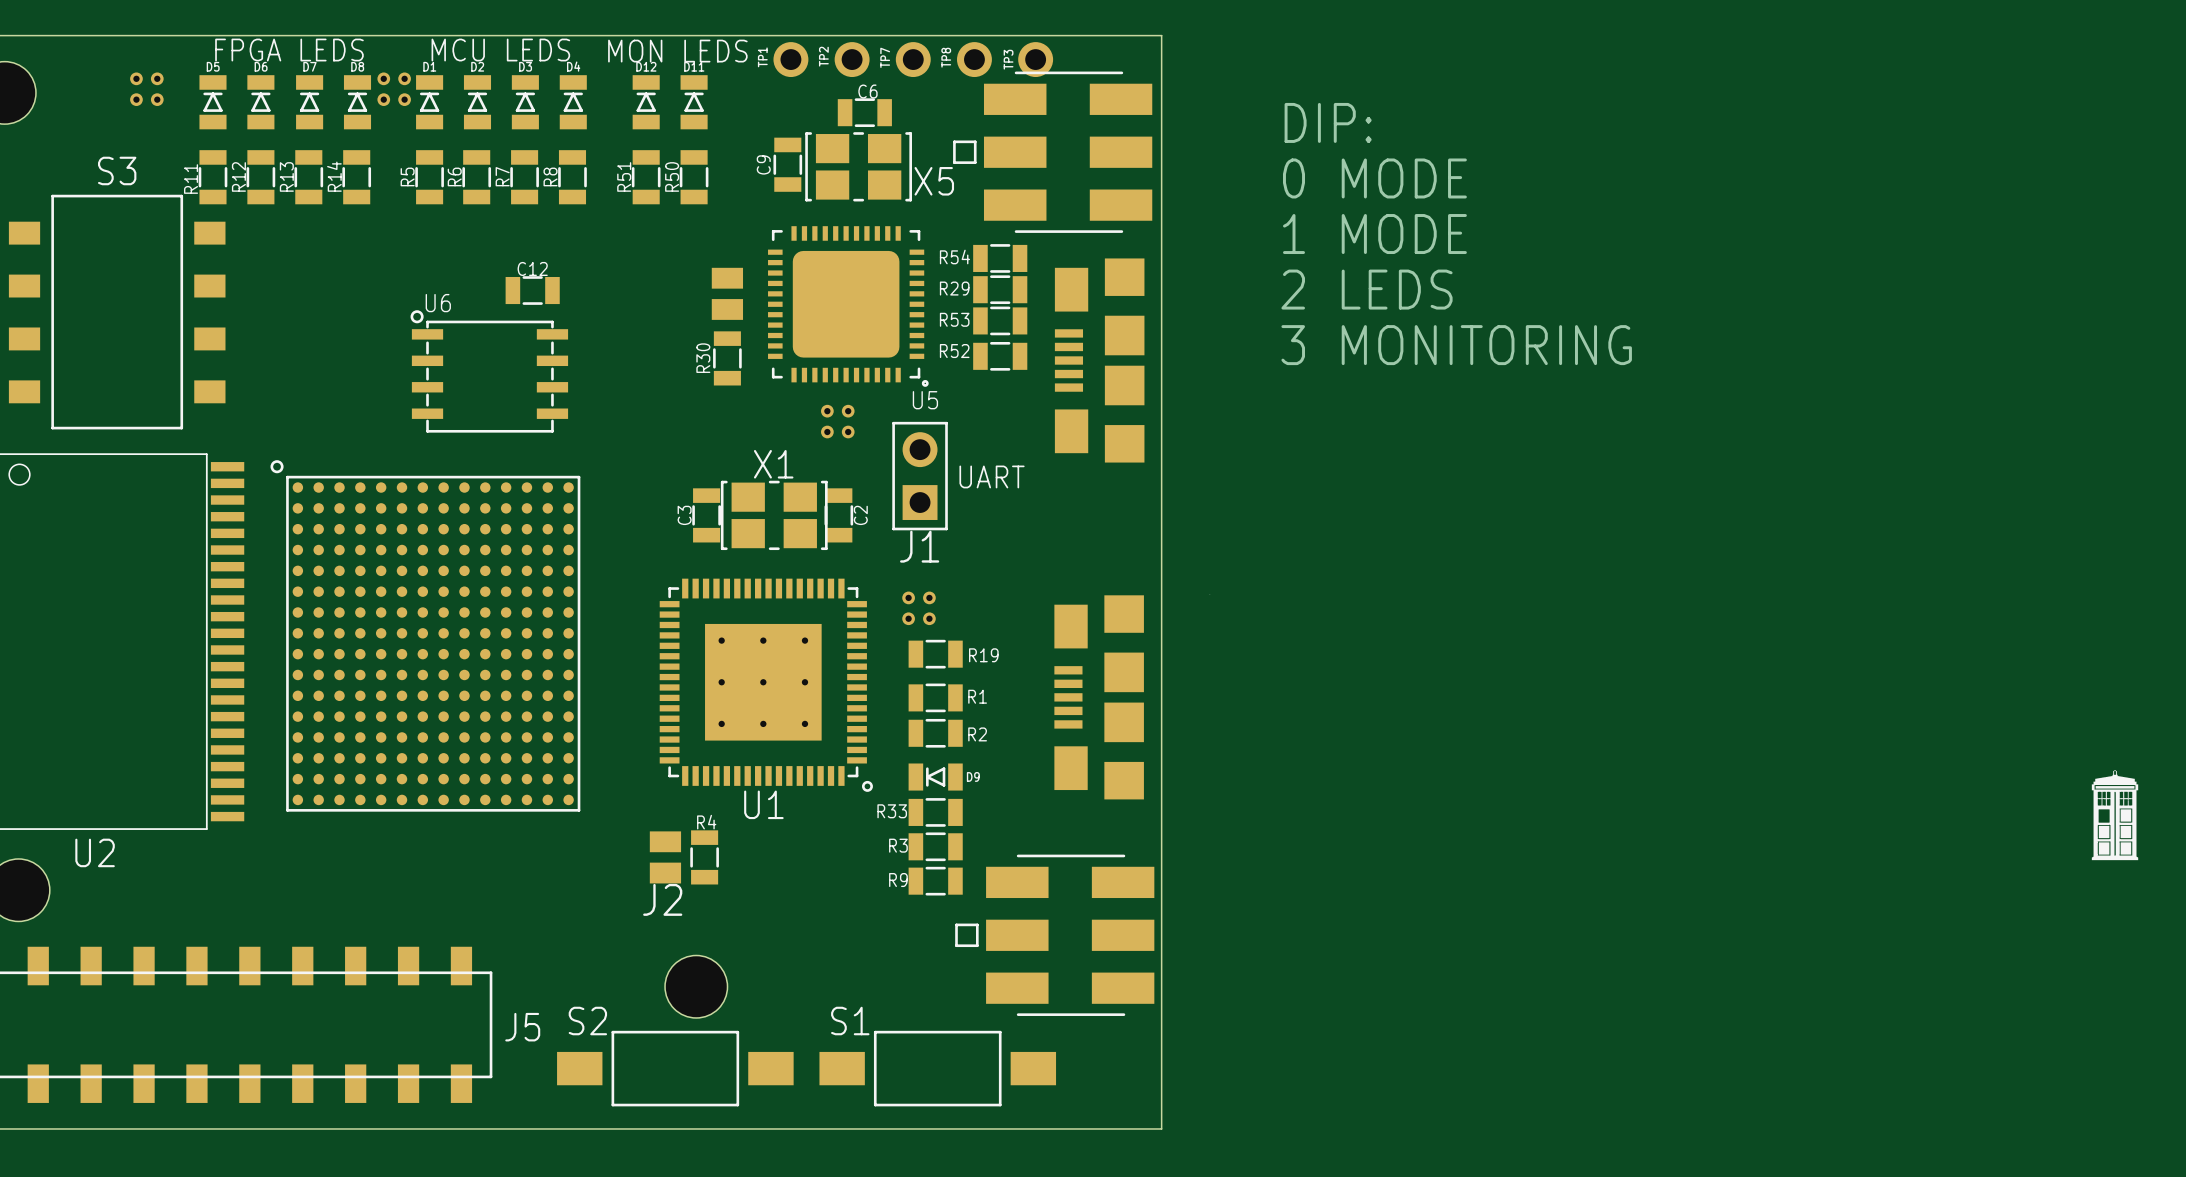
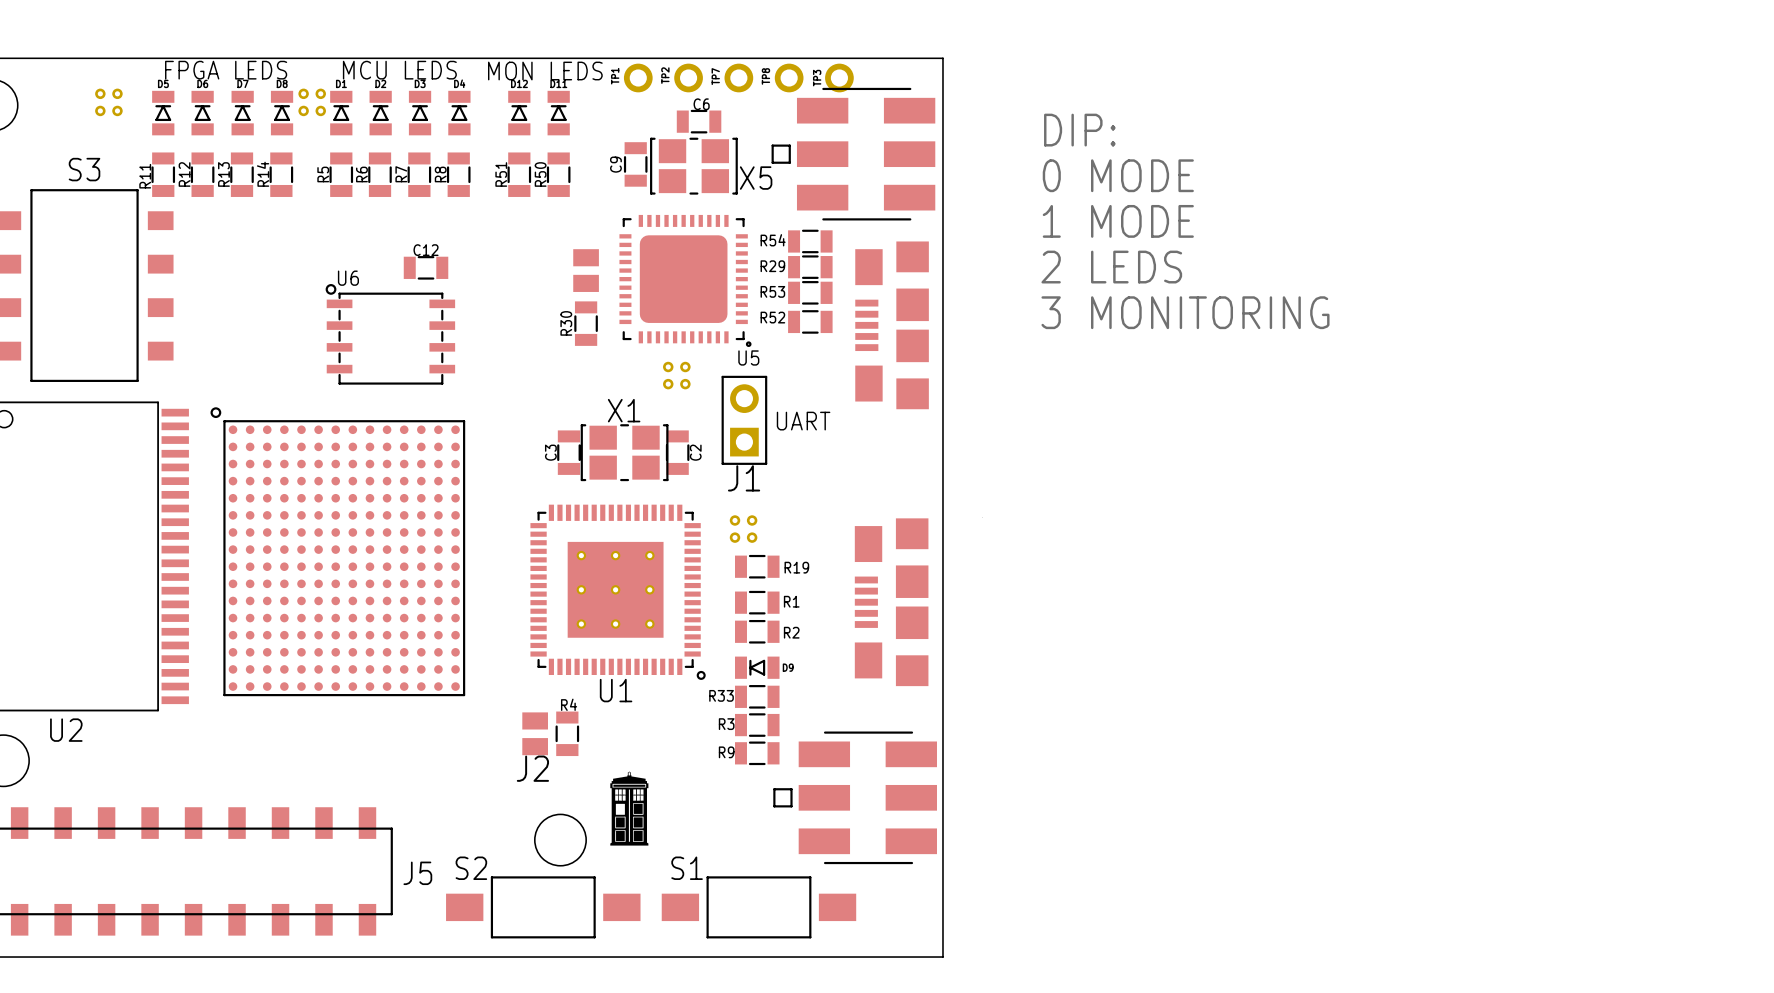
drawing: [2091, 770, 2139, 861] -> none
drawing: none -> [610, 771, 649, 846]

